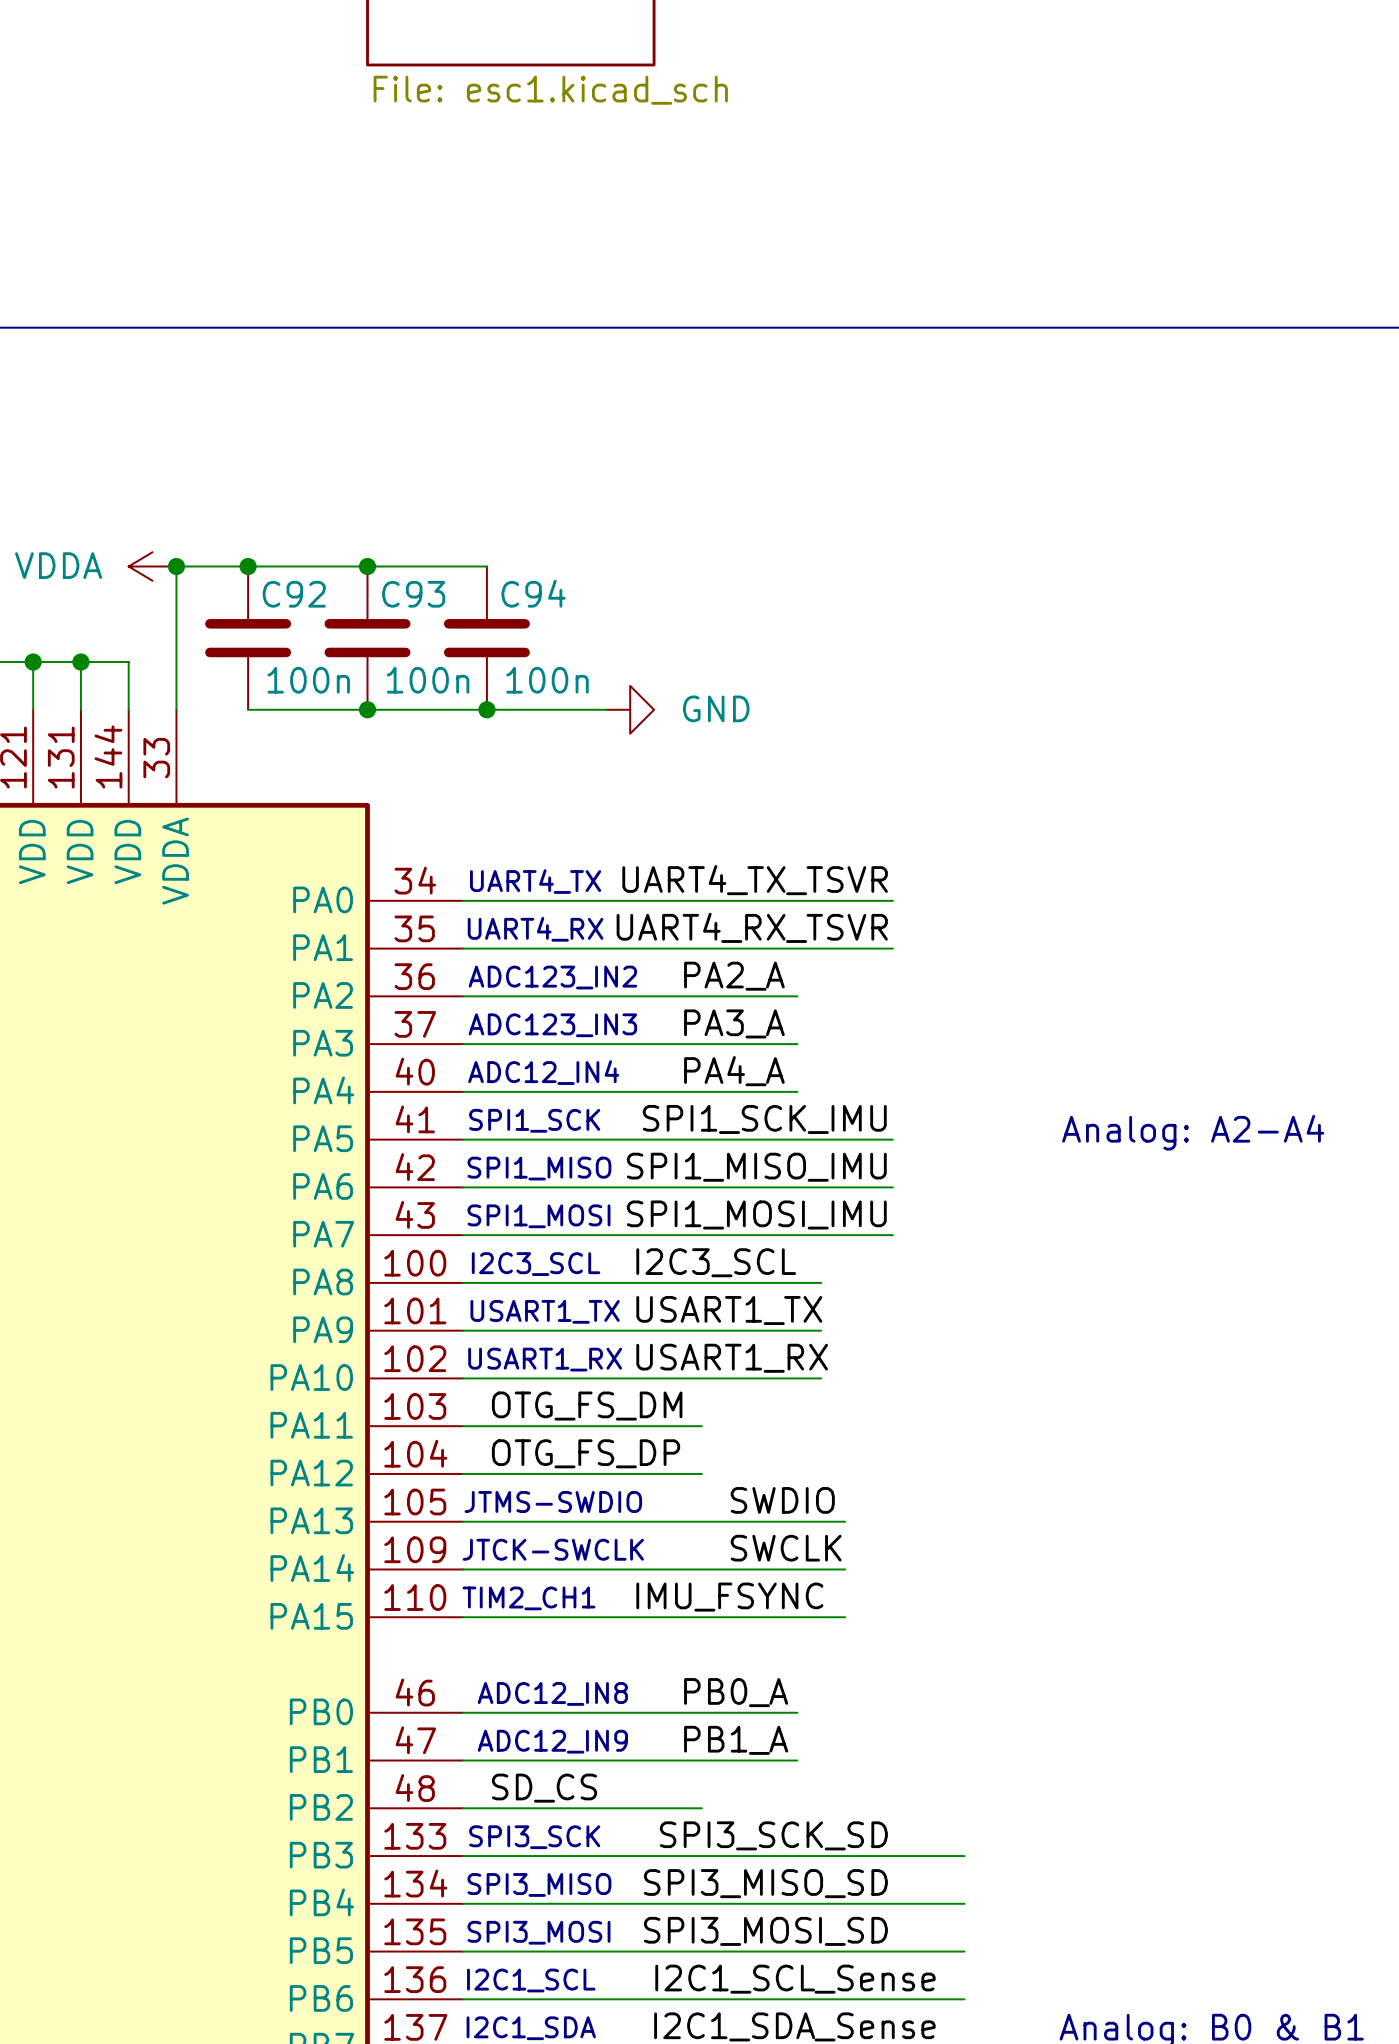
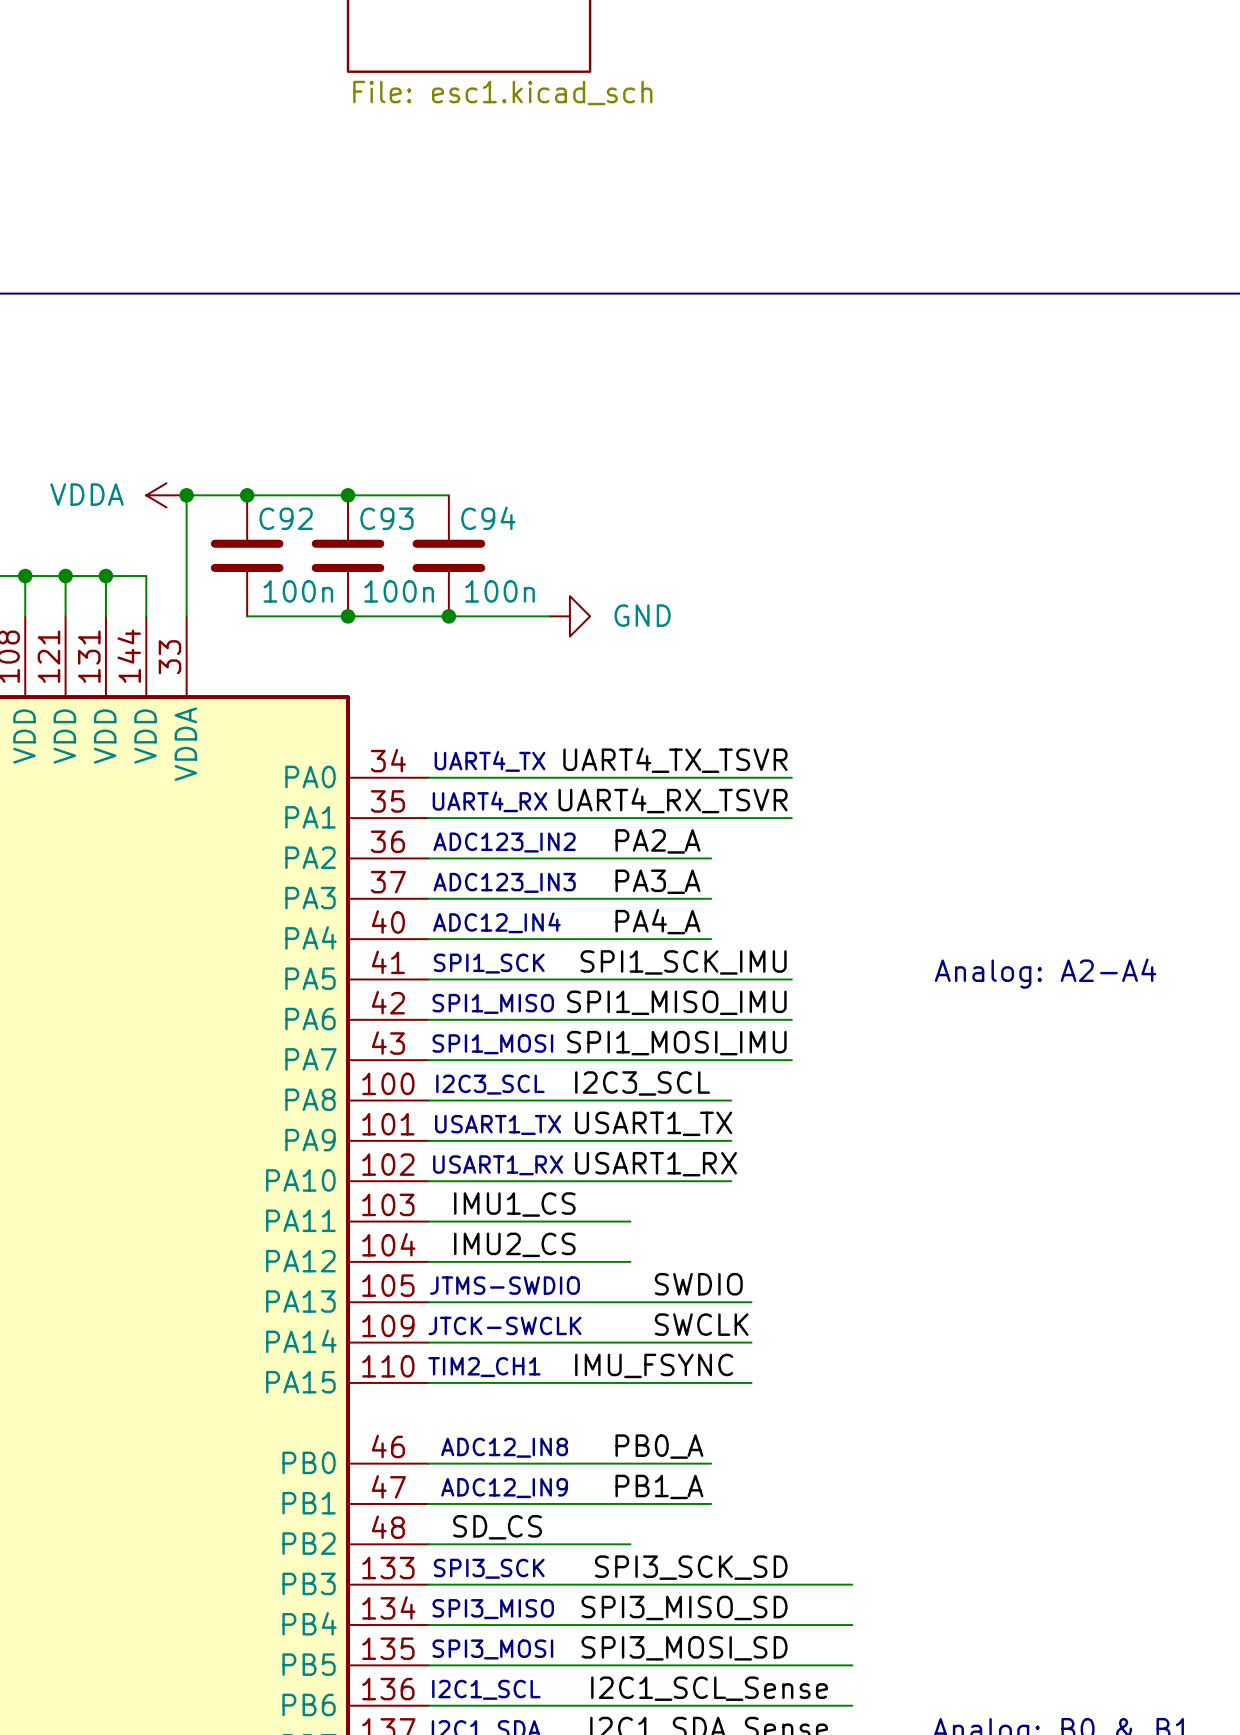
label: OTG_FS_DM (587, 1406) -> IMU1_CS (514, 1204)
label: OTG_FS_DP (586, 1453) -> IMU2_CS (514, 1244)

